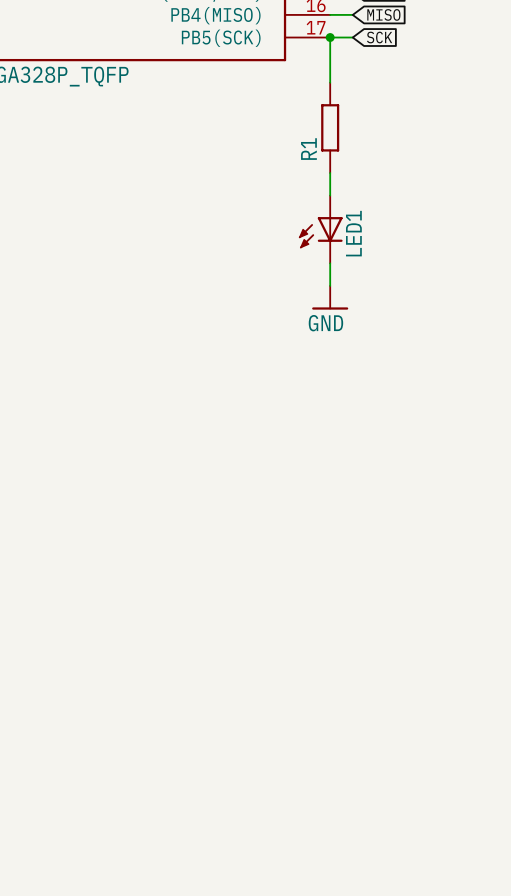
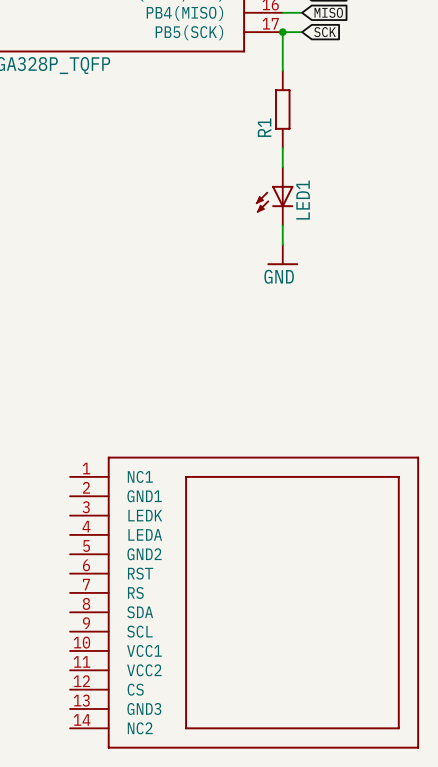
part: none -> (244, 602)

